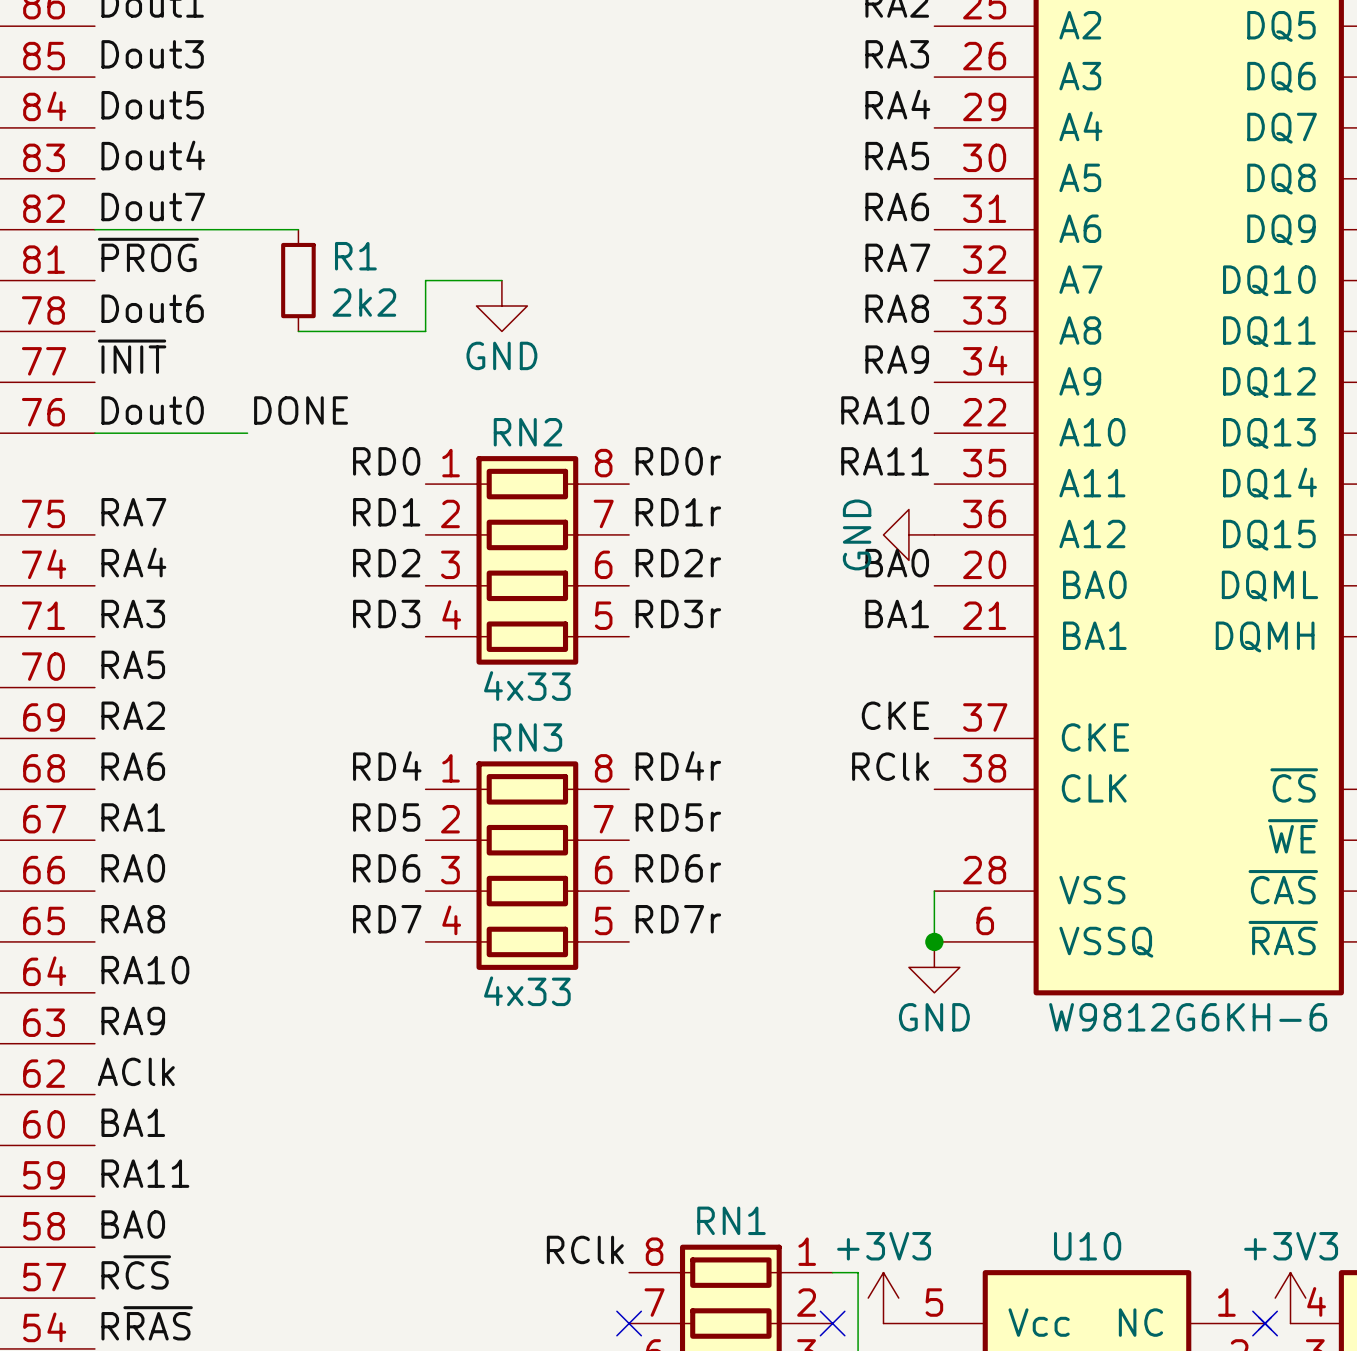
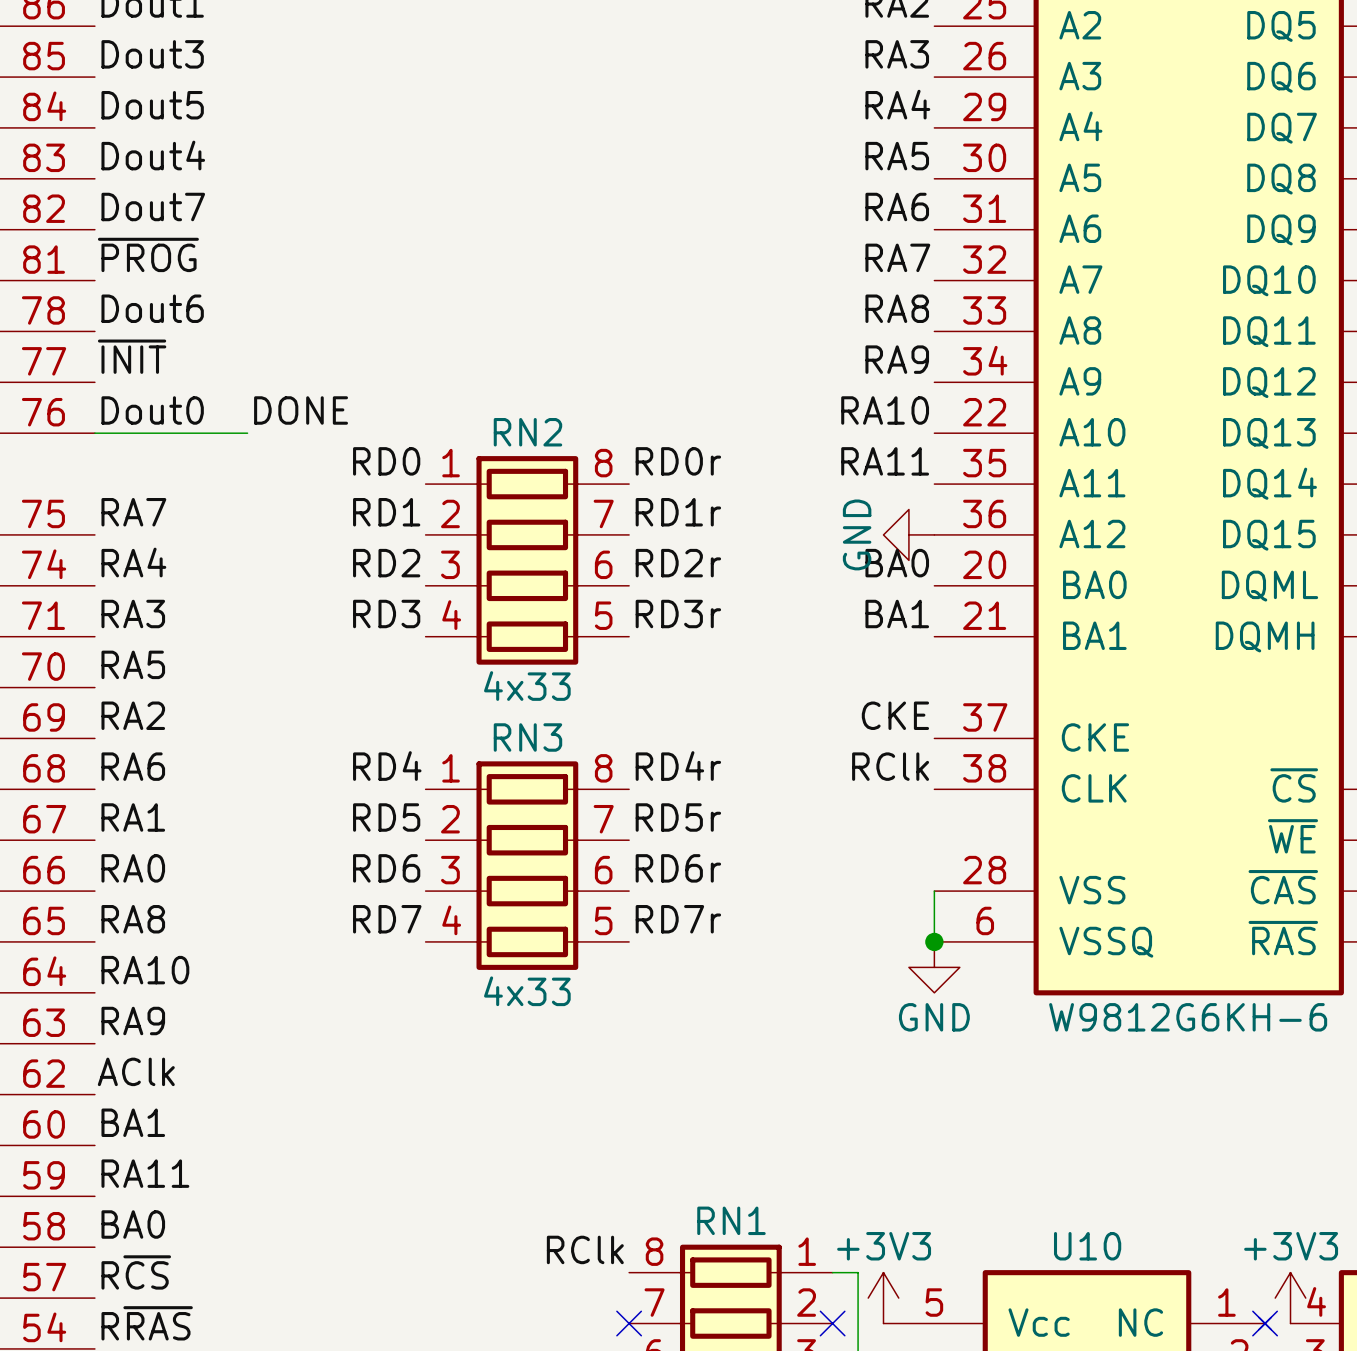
wire: (94, 229) (298, 229) -> none
R1: 2k2 (298, 280) -> none
wire: (501, 280) (425, 280) (425, 331) (298, 331) -> none
power symbol: GND (501, 306) -> none

